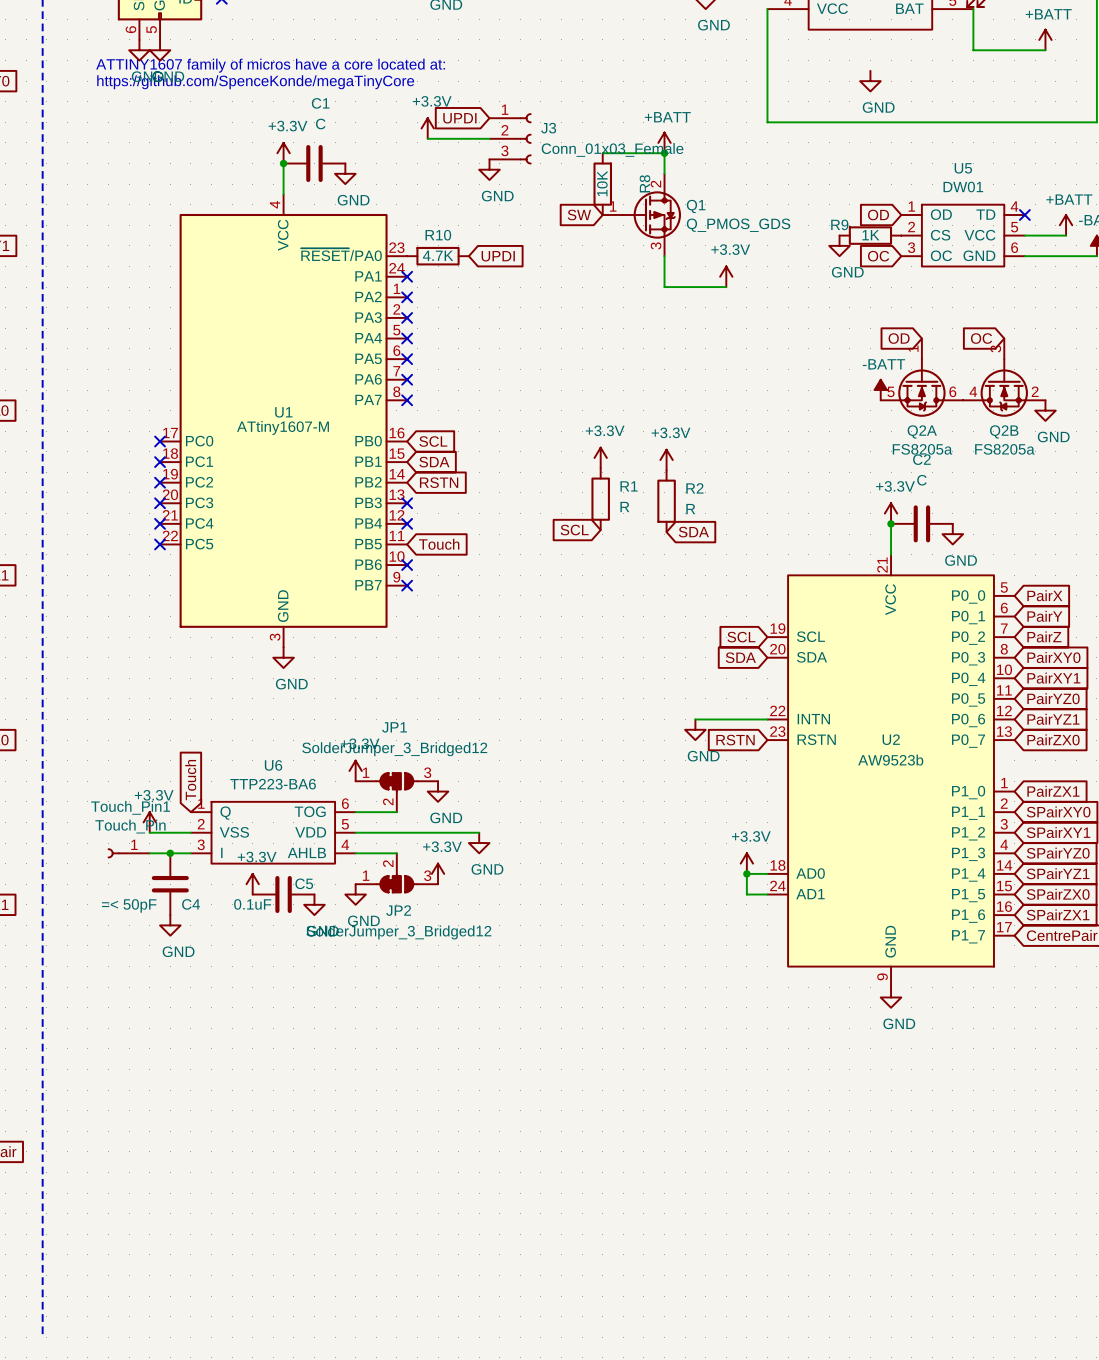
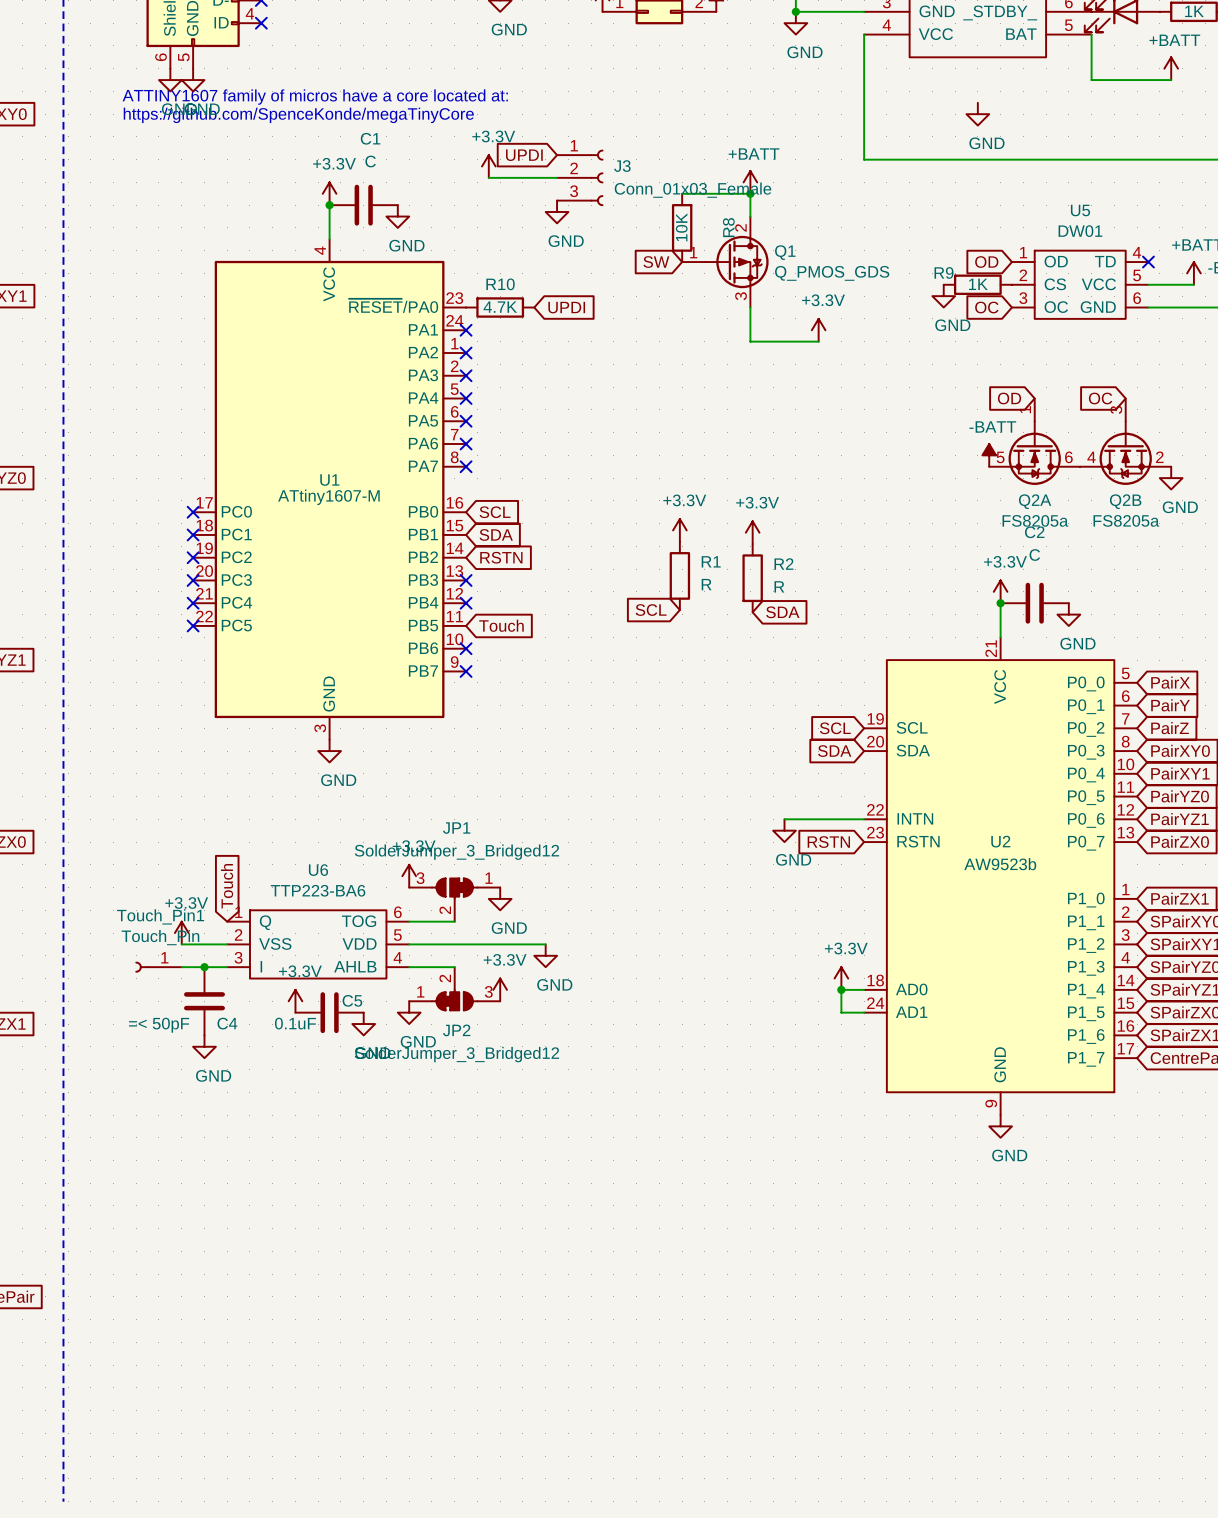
JP1 flip: as is (396, 782) -> left-right (454, 888)

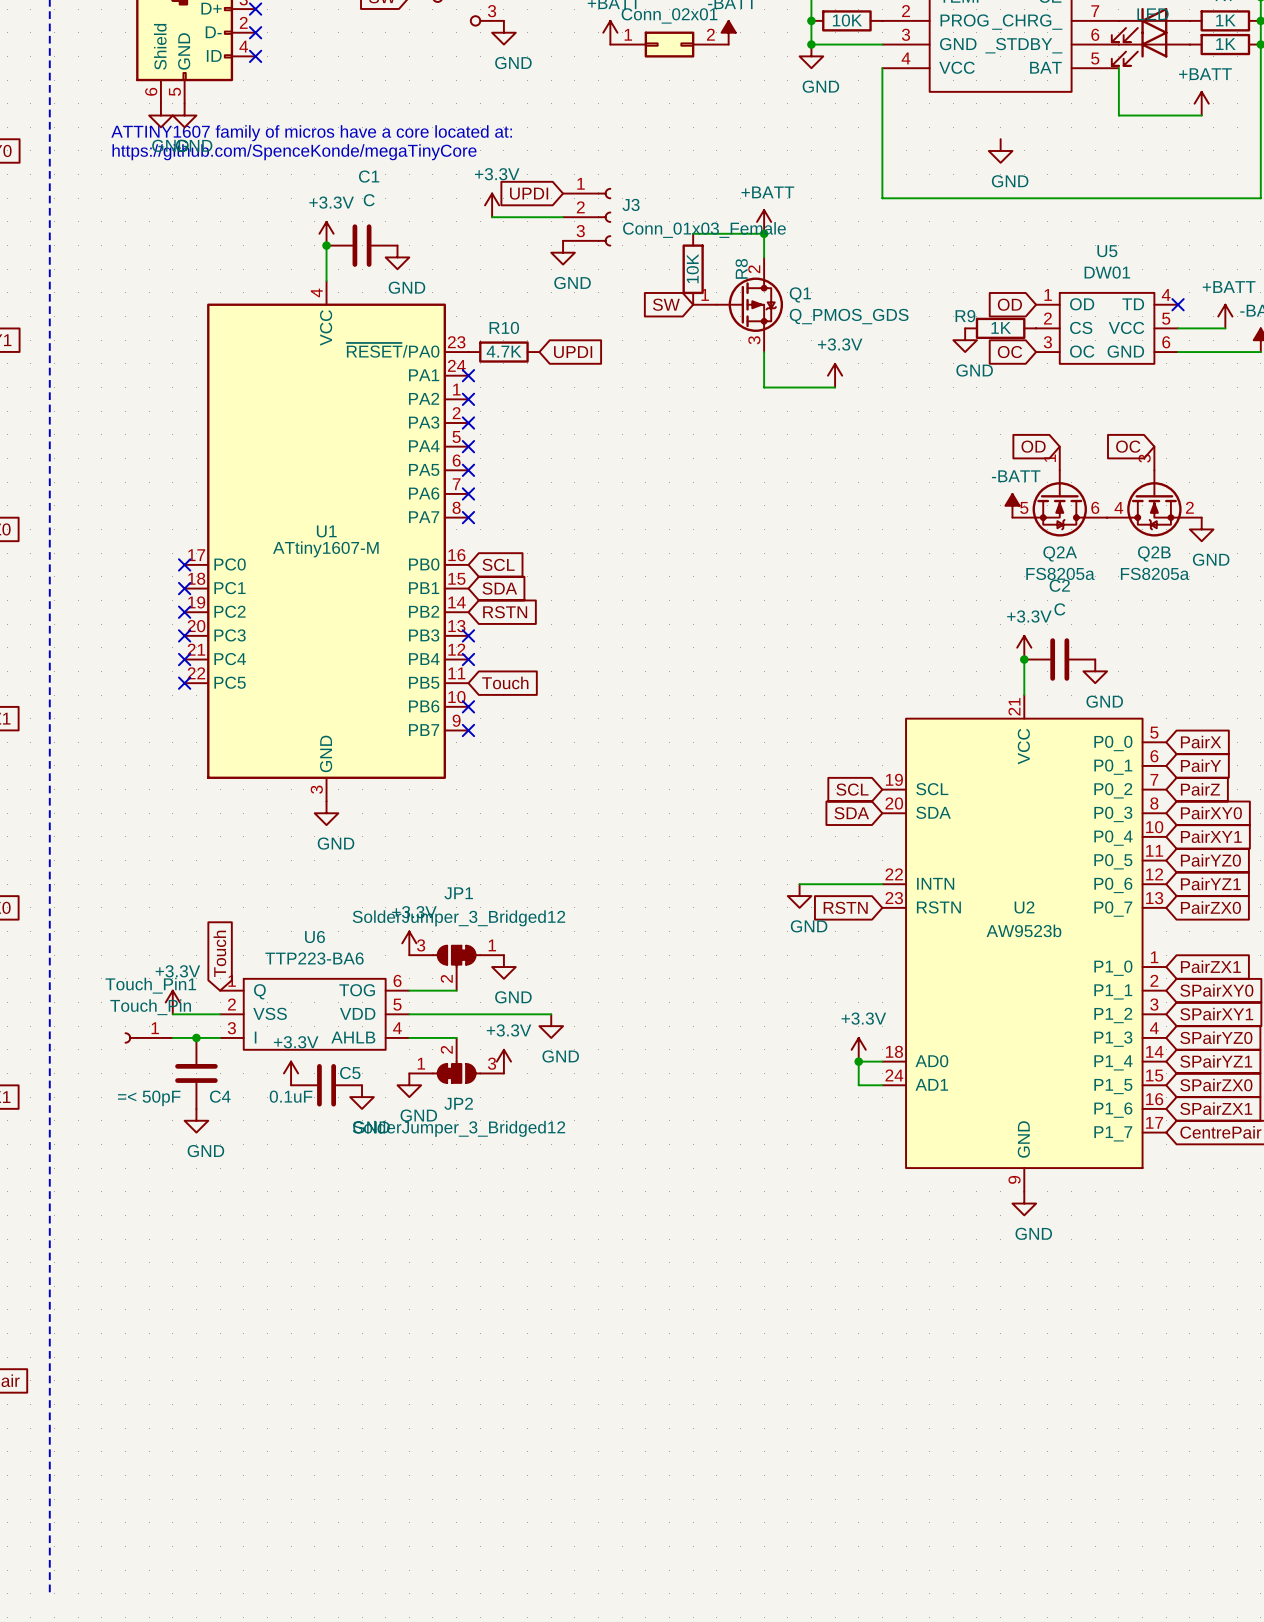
power symbol: +3.3V (679, 530) -> none
power symbol: +3.3V (752, 532) -> none
R1: R (679, 575) -> none
R2: R (752, 578) -> none
global label: SCL (651, 610) -> none
global label: SDA (782, 612) -> none

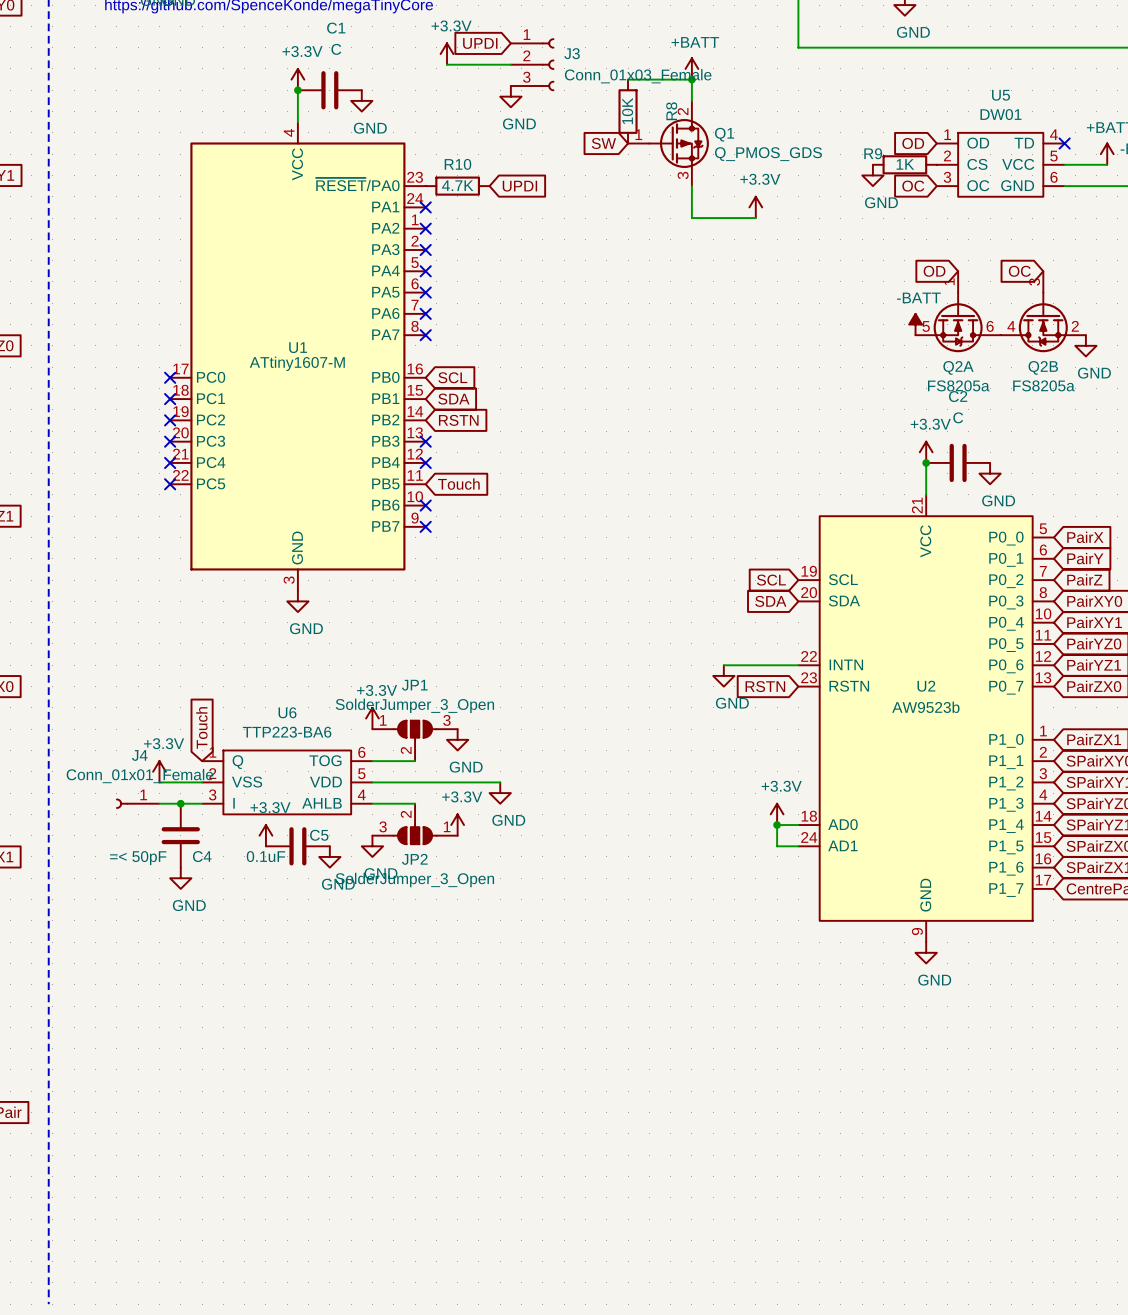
JP1 value: SolderJumper_3_Bridged12 (458, 918) -> SolderJumper_3_Open (414, 705)
JP1 symbol: [409, 945, 504, 991] -> [372, 720, 458, 762]
Touch_Pin1 name: Touch_Pin1 (150, 985) -> J4 (139, 755)
Touch_Pin1 value: Touch_Pin (150, 1007) -> Conn_01x01_Female (139, 776)
JP2 symbol: [409, 1037, 504, 1083] -> [372, 803, 458, 845]
JP2 value: SolderJumper_3_Bridged12 (458, 1128) -> SolderJumper_3_Open (414, 880)

